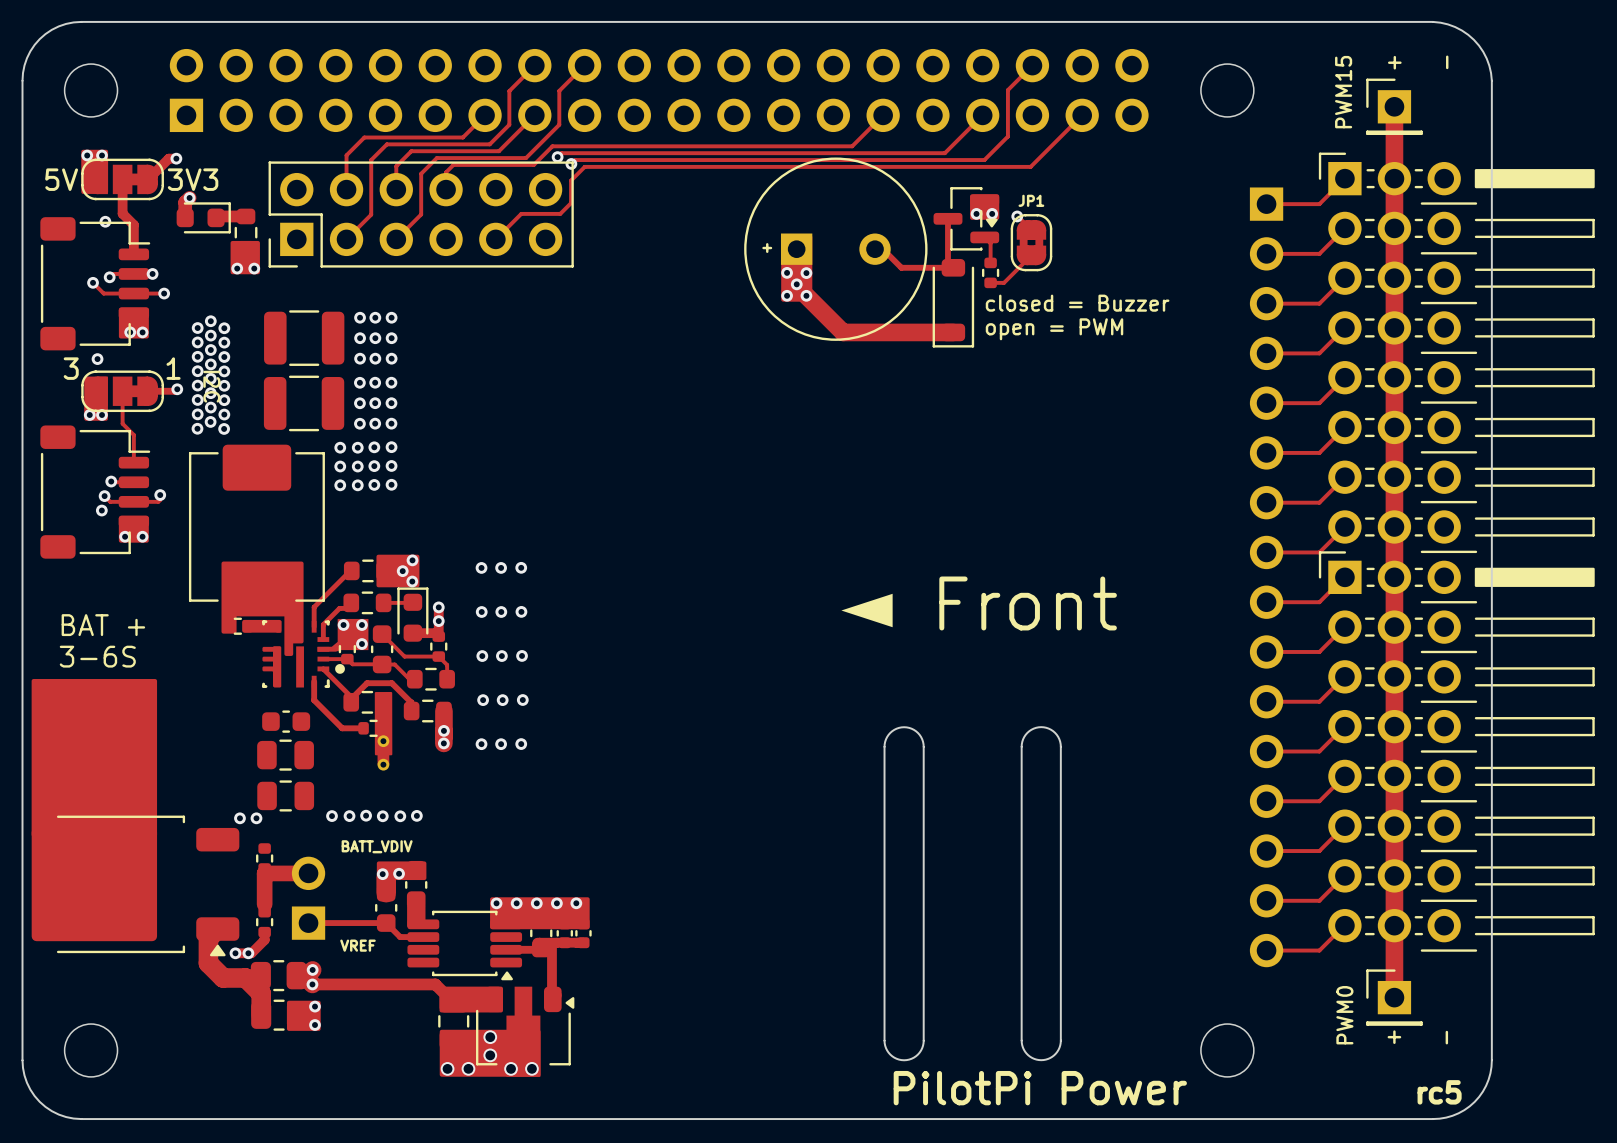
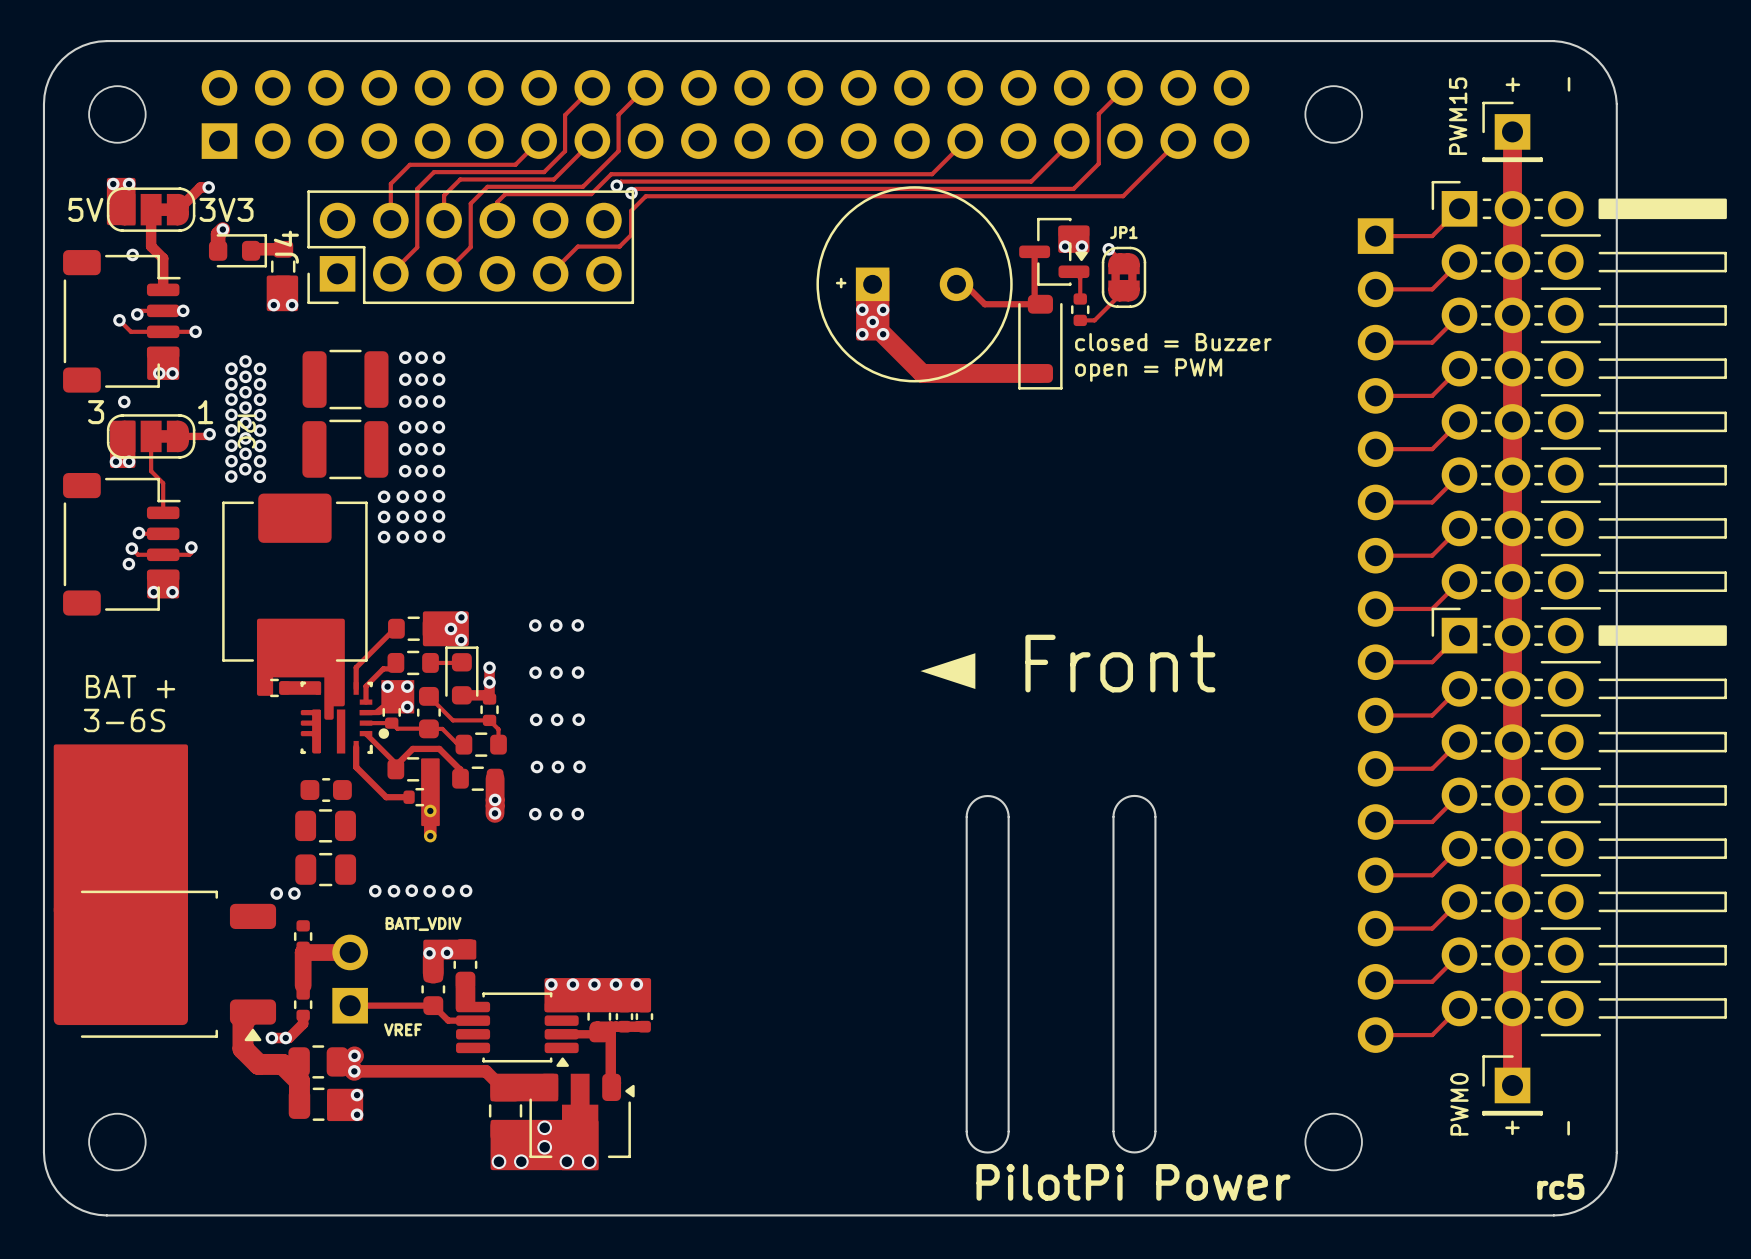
J4 name: none -> J4 (286, 247)

